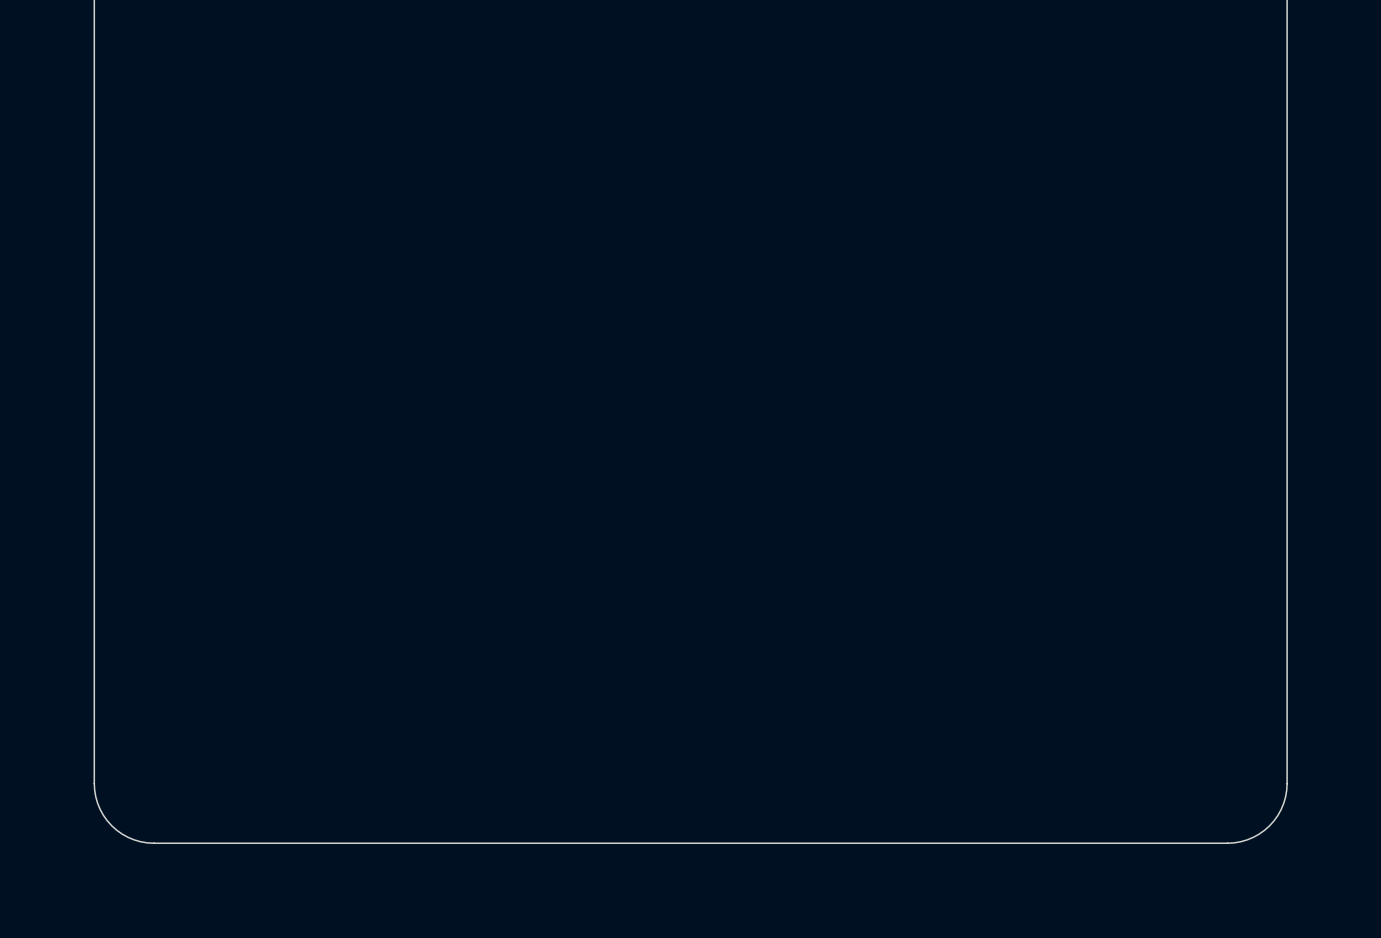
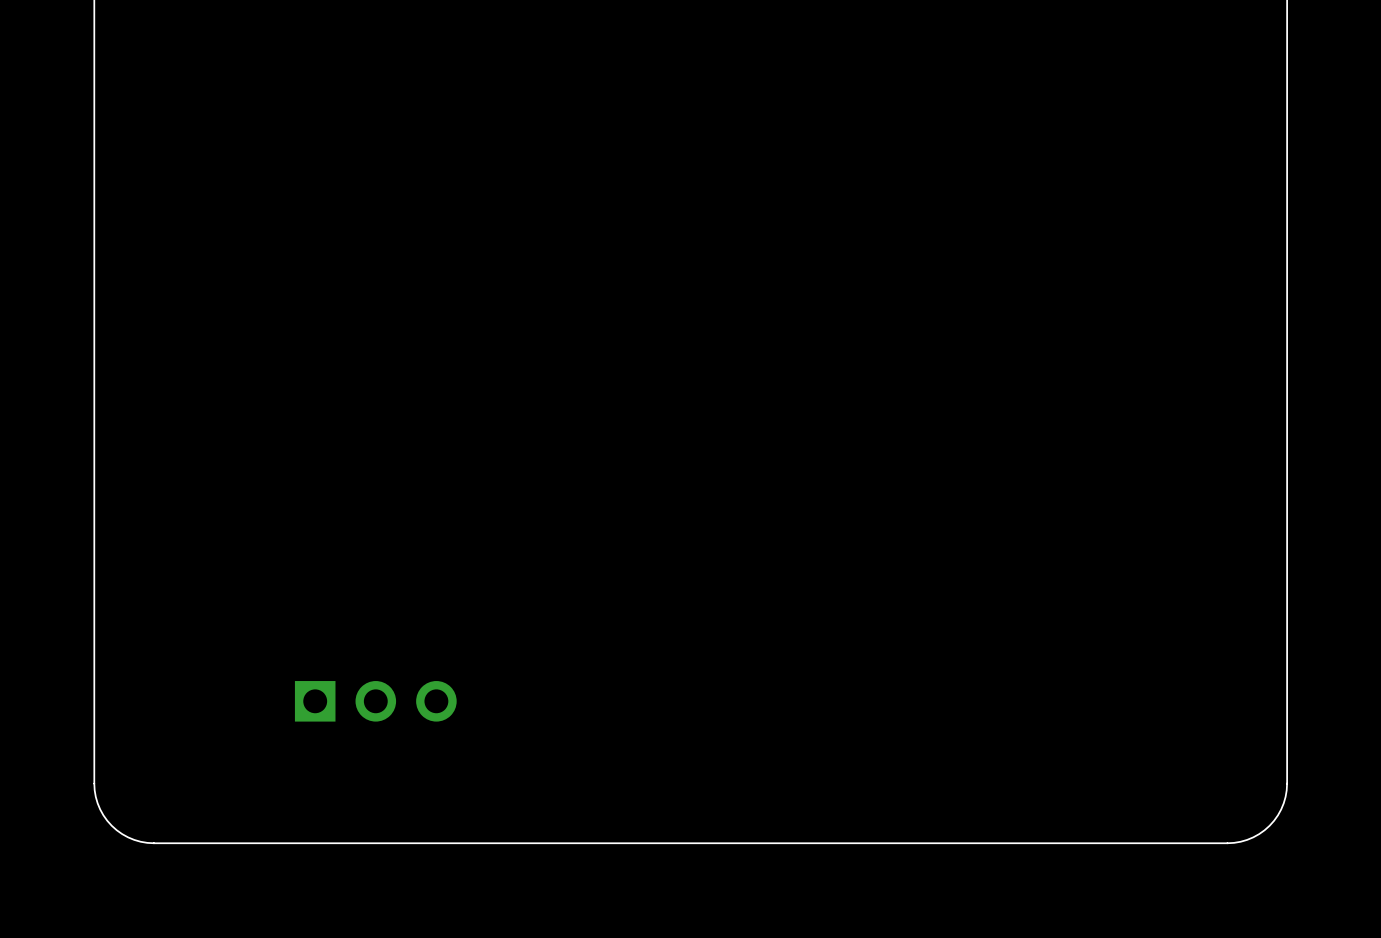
part: none -> (375, 701)

